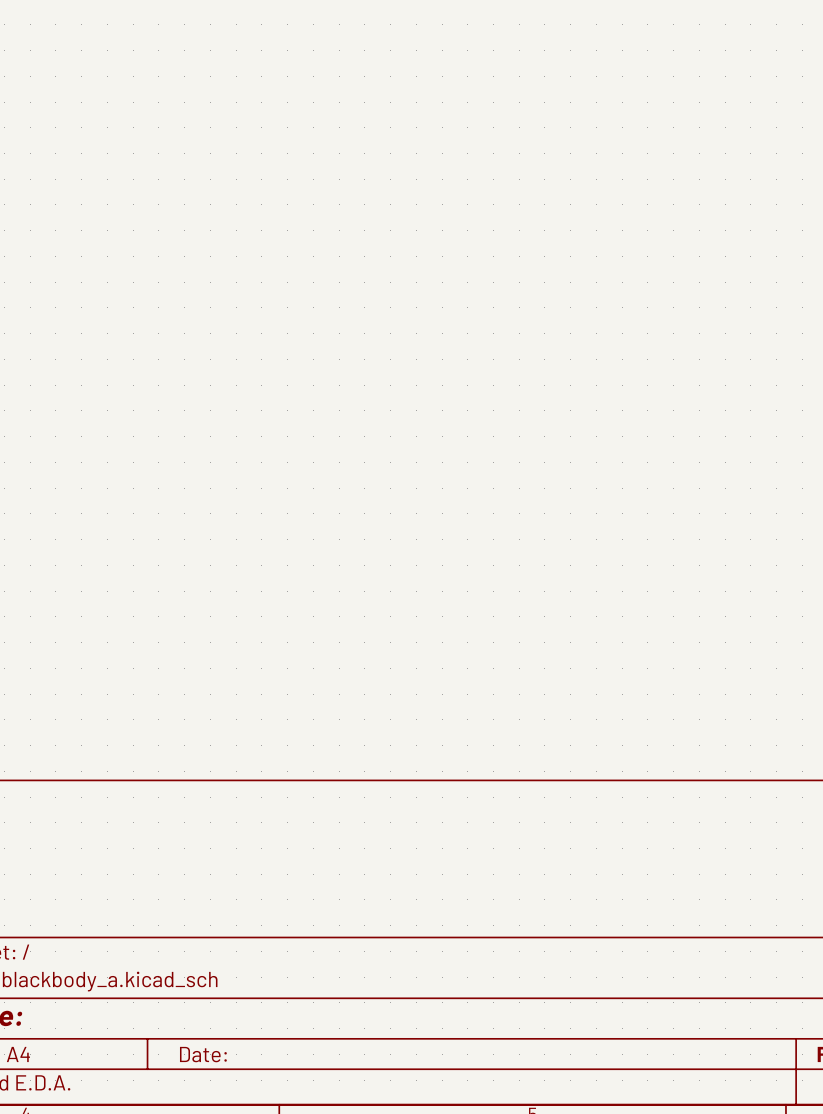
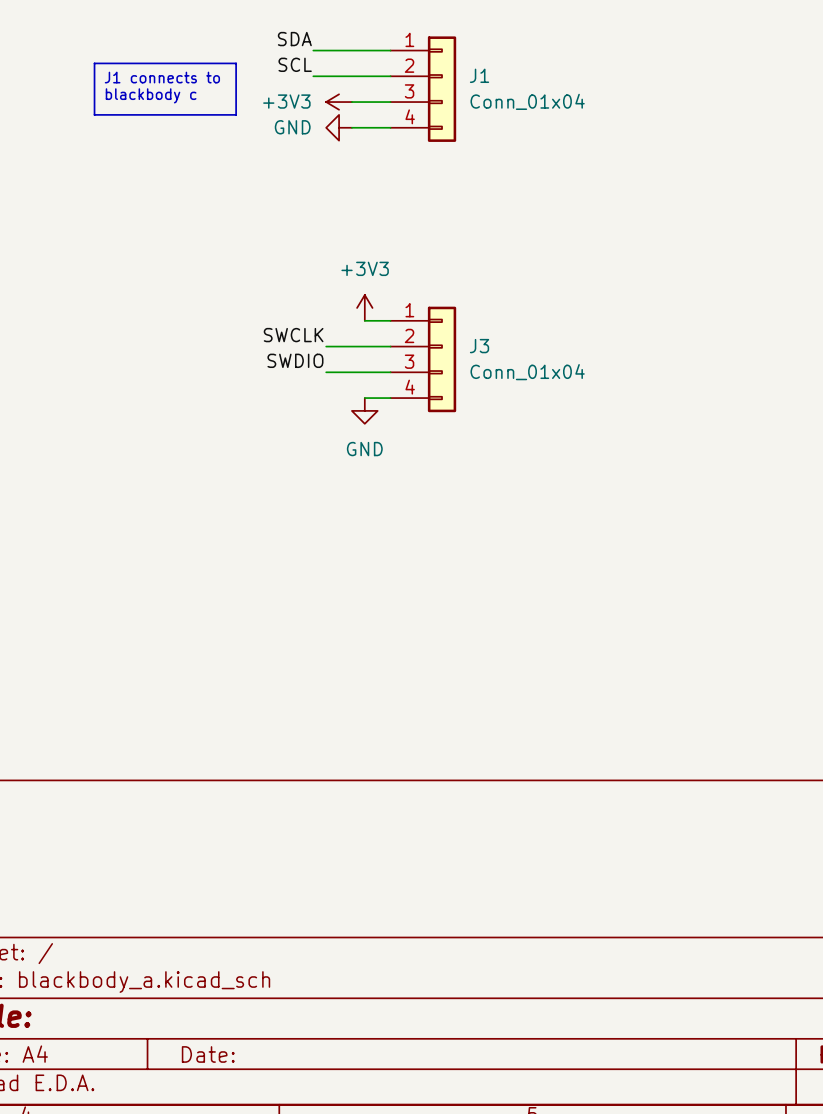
label: none -> SDA (294, 39)
wire: none -> (313, 50) (390, 50)
line: none -> (94, 63) (236, 63) (236, 114) (94, 114) (94, 63)
label: none -> SCL (295, 64)
wire: none -> (313, 76) (390, 76)
text: none -> J1 connects to (162, 77)
J1: none -> Conn_01x04 (423, 89)
text: none -> blackbody c (151, 95)
power symbol: none -> +3V3 (339, 102)
wire: none -> (351, 102) (390, 102)
power symbol: none -> GND (339, 127)
wire: none -> (351, 127) (390, 127)
power symbol: none -> +3V3 (364, 307)
wire: none -> (364, 320) (390, 320)
label: none -> SWCLK (293, 335)
wire: none -> (326, 346) (390, 346)
J3: none -> Conn_01x04 (423, 359)
label: none -> SWDIO (295, 360)
wire: none -> (326, 372) (390, 372)
wire: none -> (364, 398) (390, 398)
power symbol: none -> GND (364, 410)

